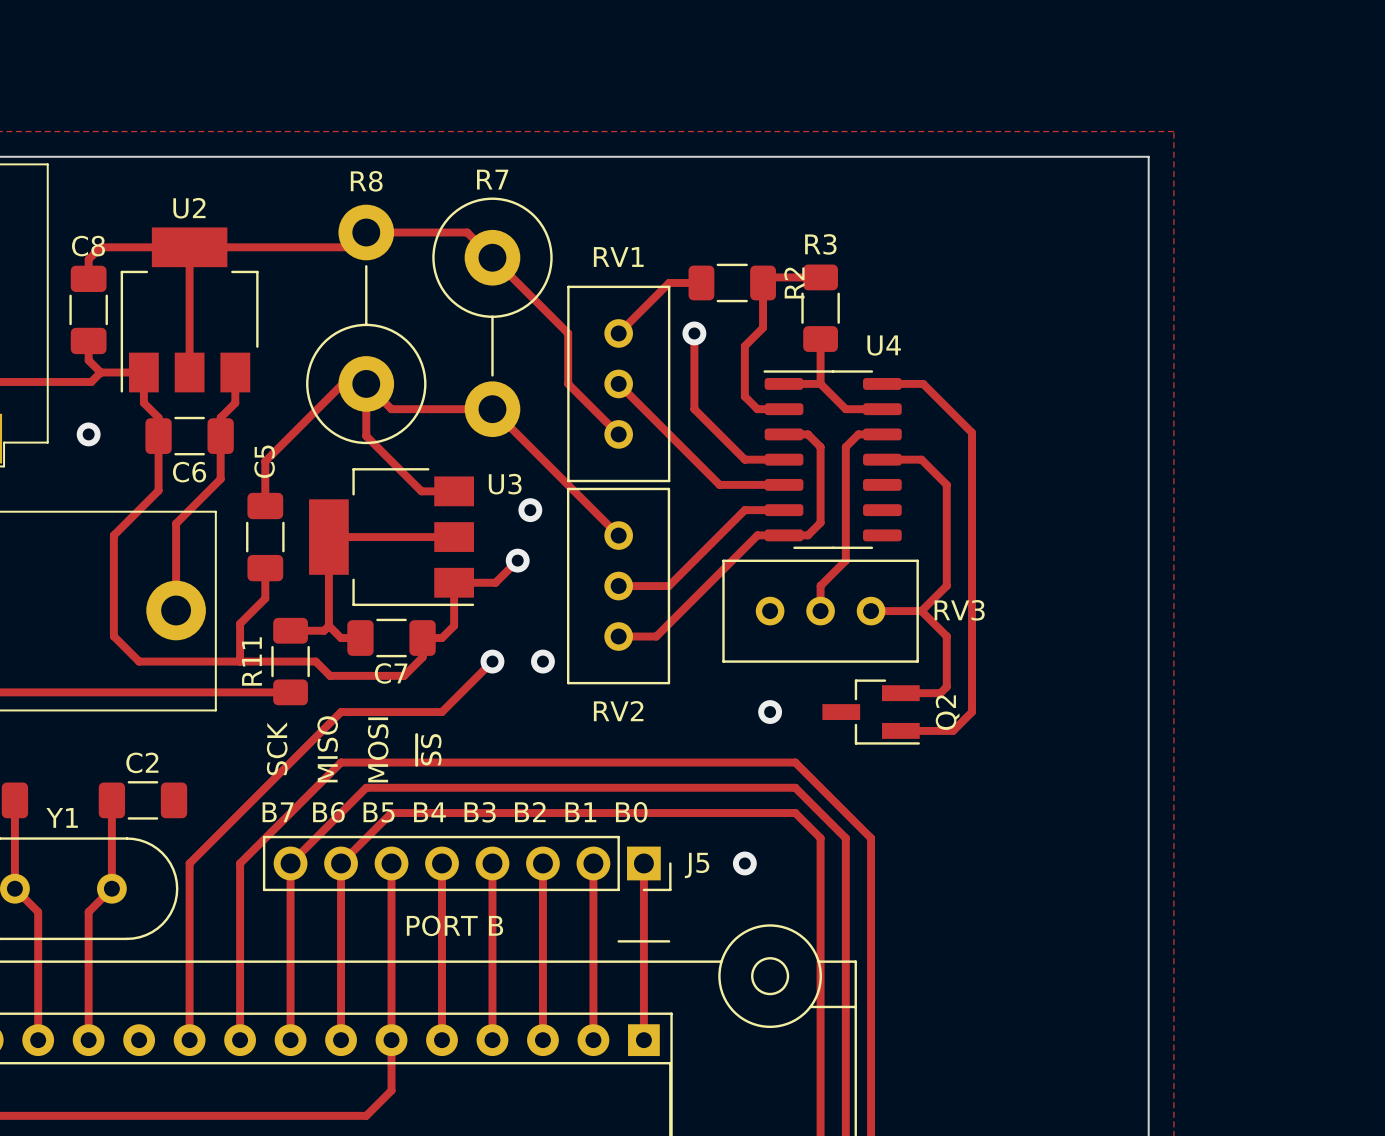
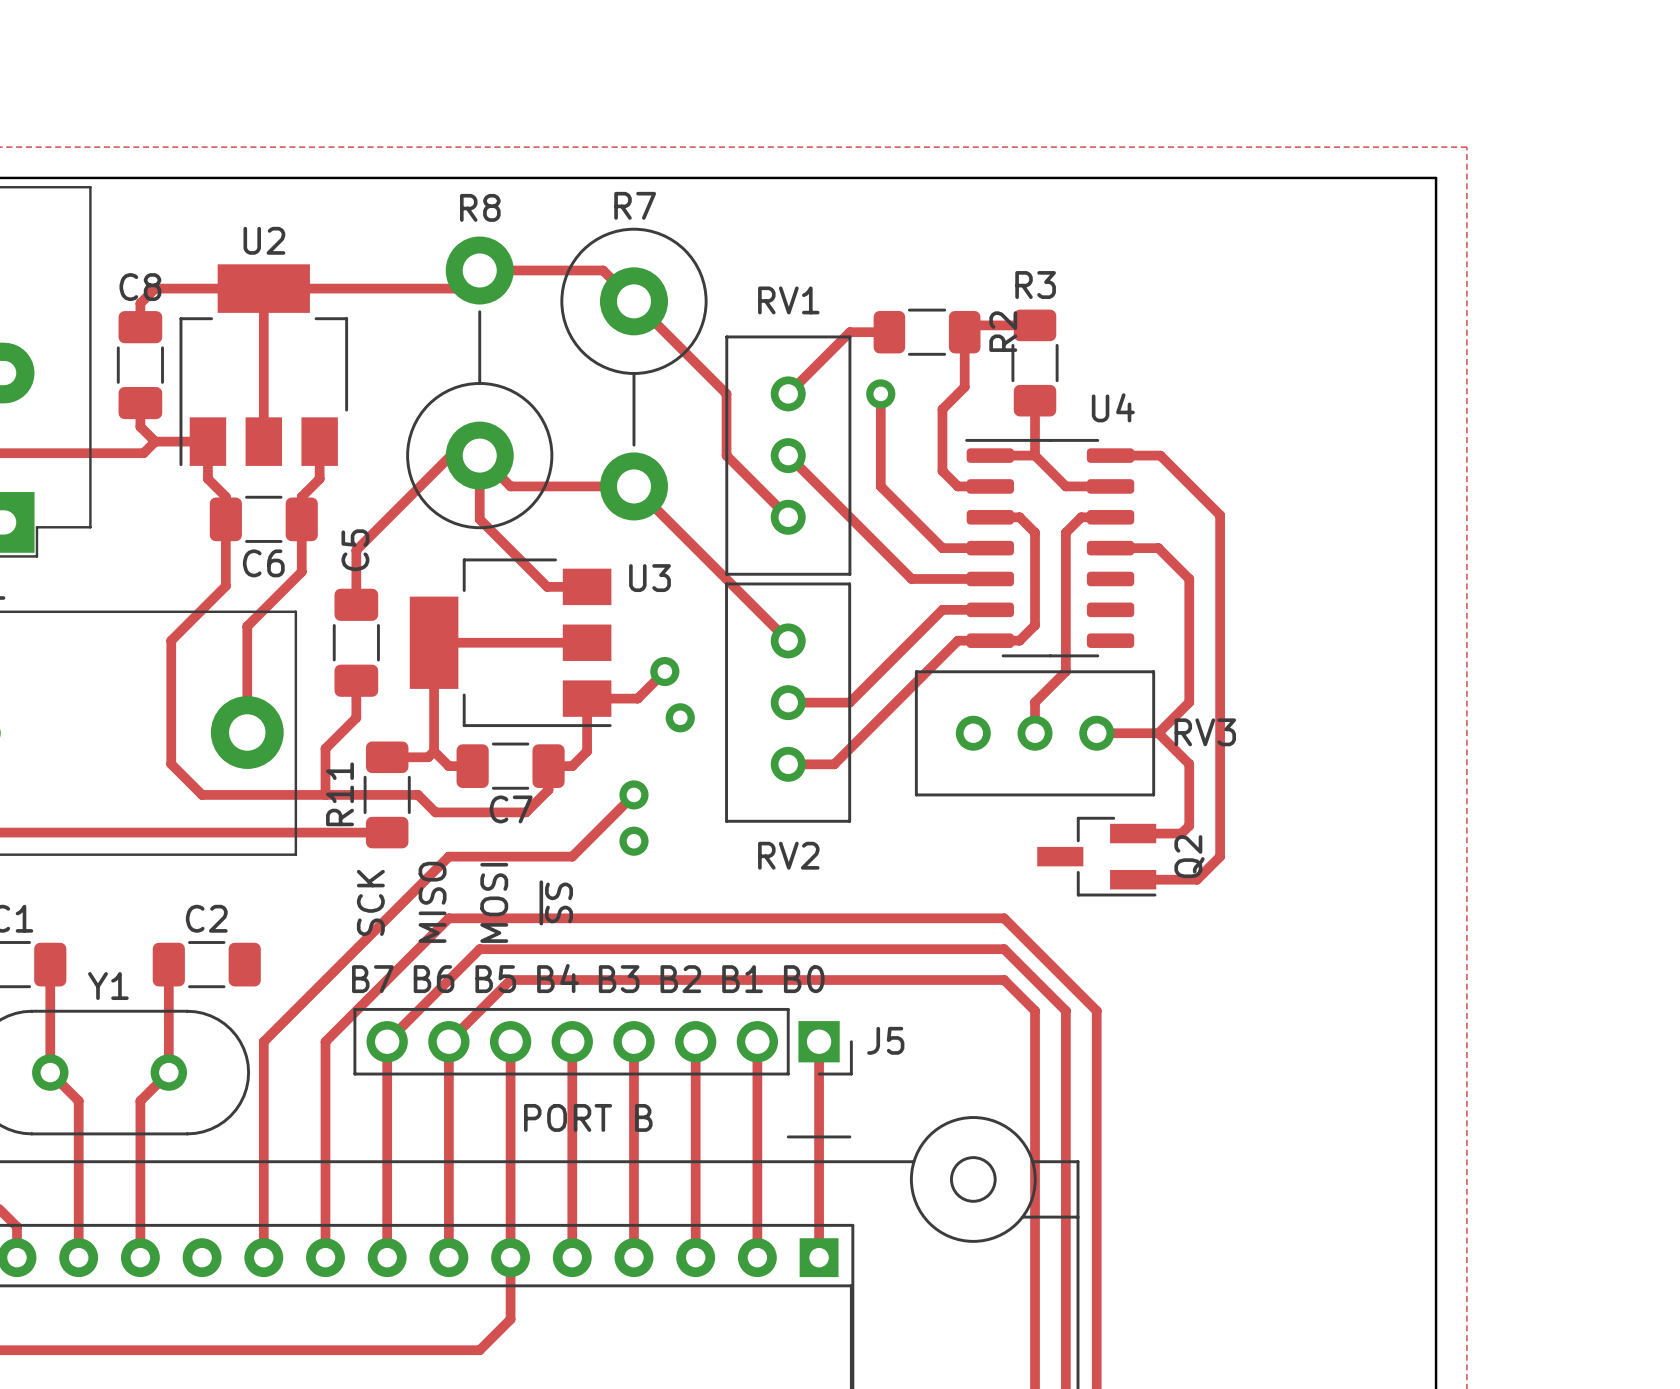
via: (88, 434) -> none
via: (530, 510) -> none
via: none -> (680, 717)
via: (542, 661) -> none
via: none -> (633, 841)
via: (770, 712) -> none
via: (744, 863) -> none

